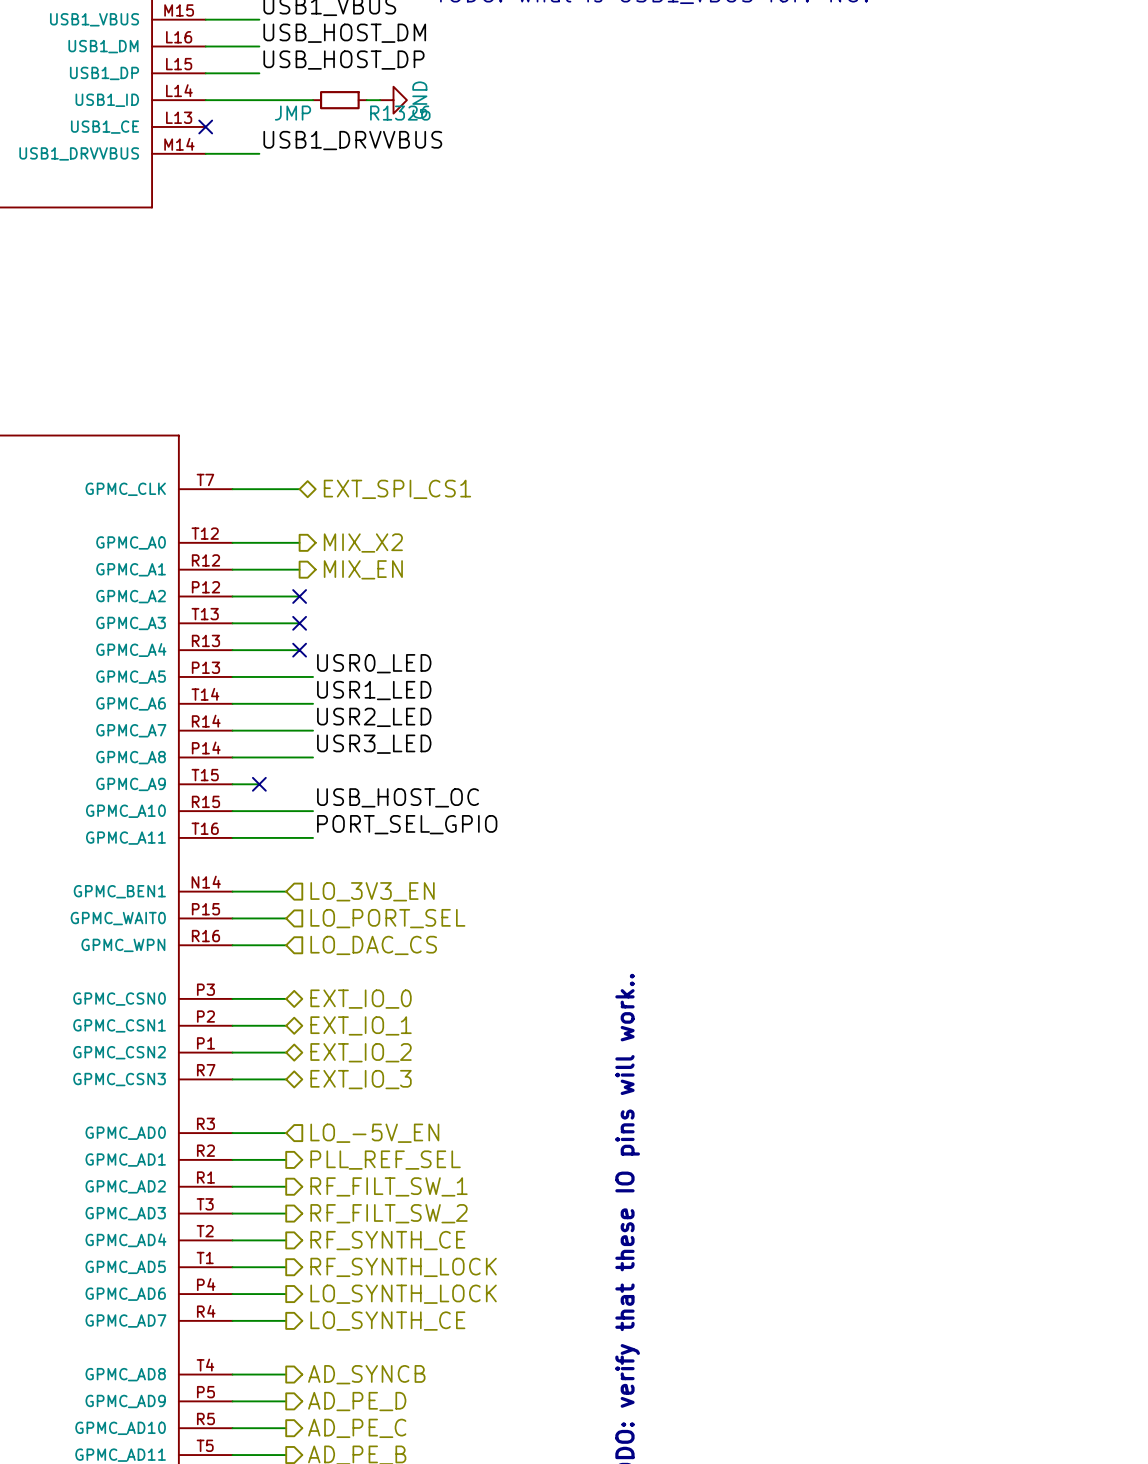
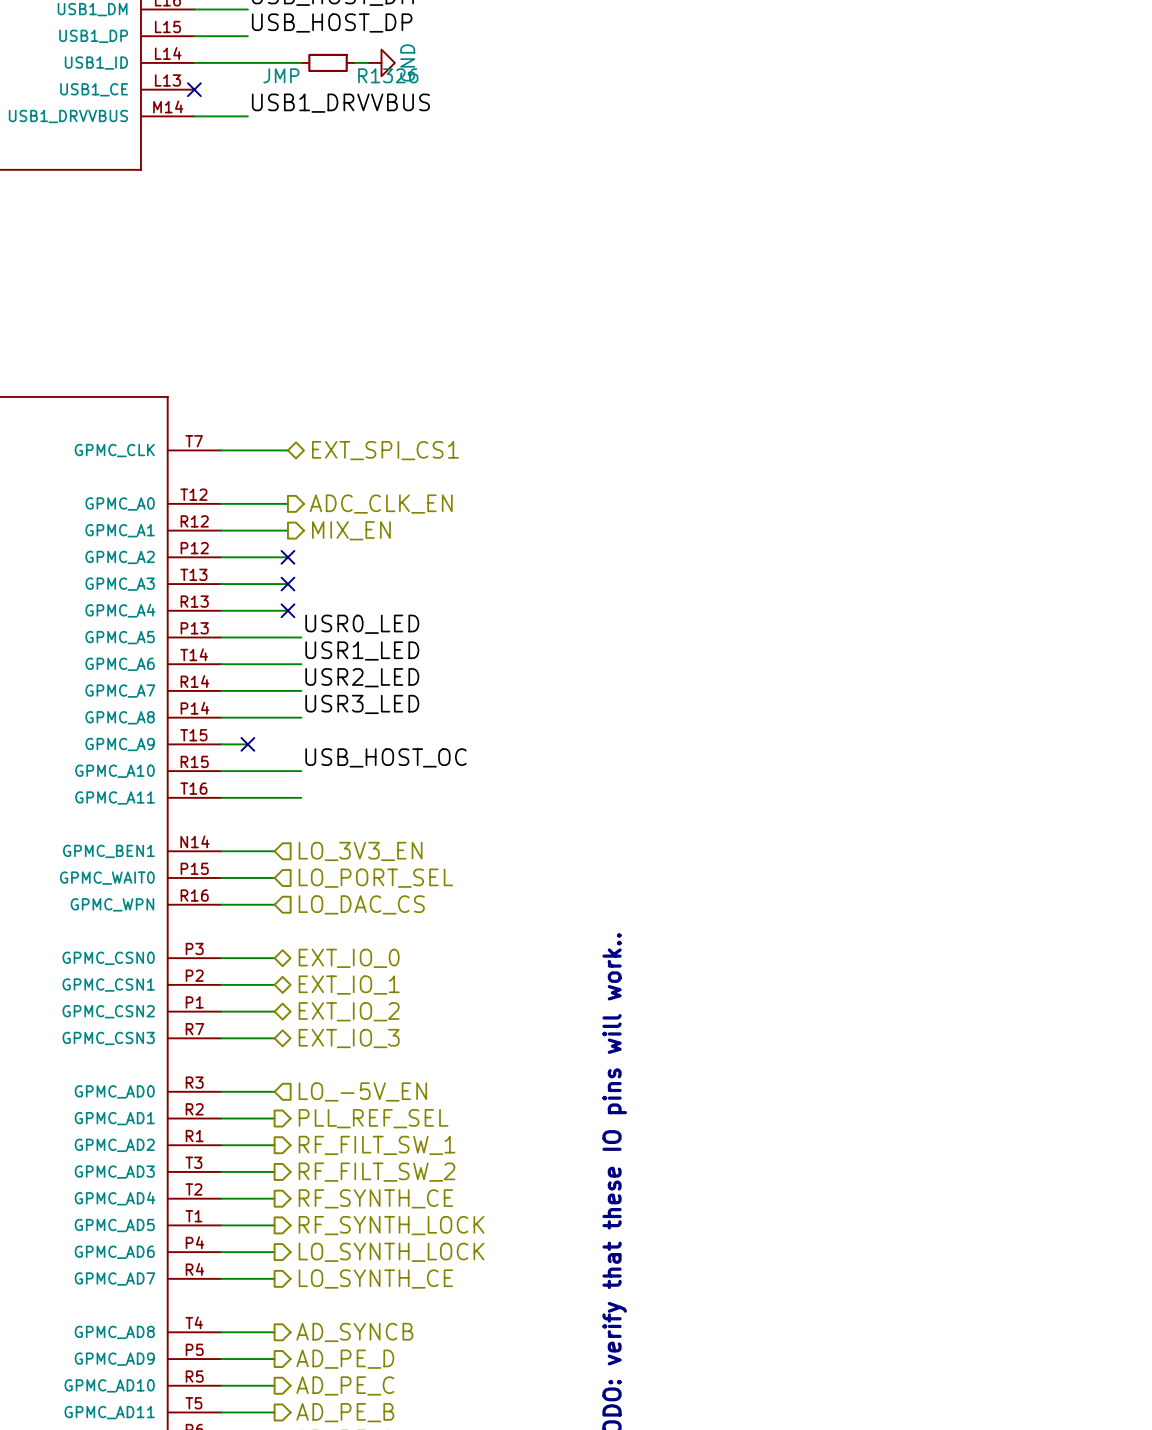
hierarchical label: MIX_X2 (363, 543) -> ADC_CLK_EN (381, 504)
label: PORT_SEL_GPIO (407, 824) -> none

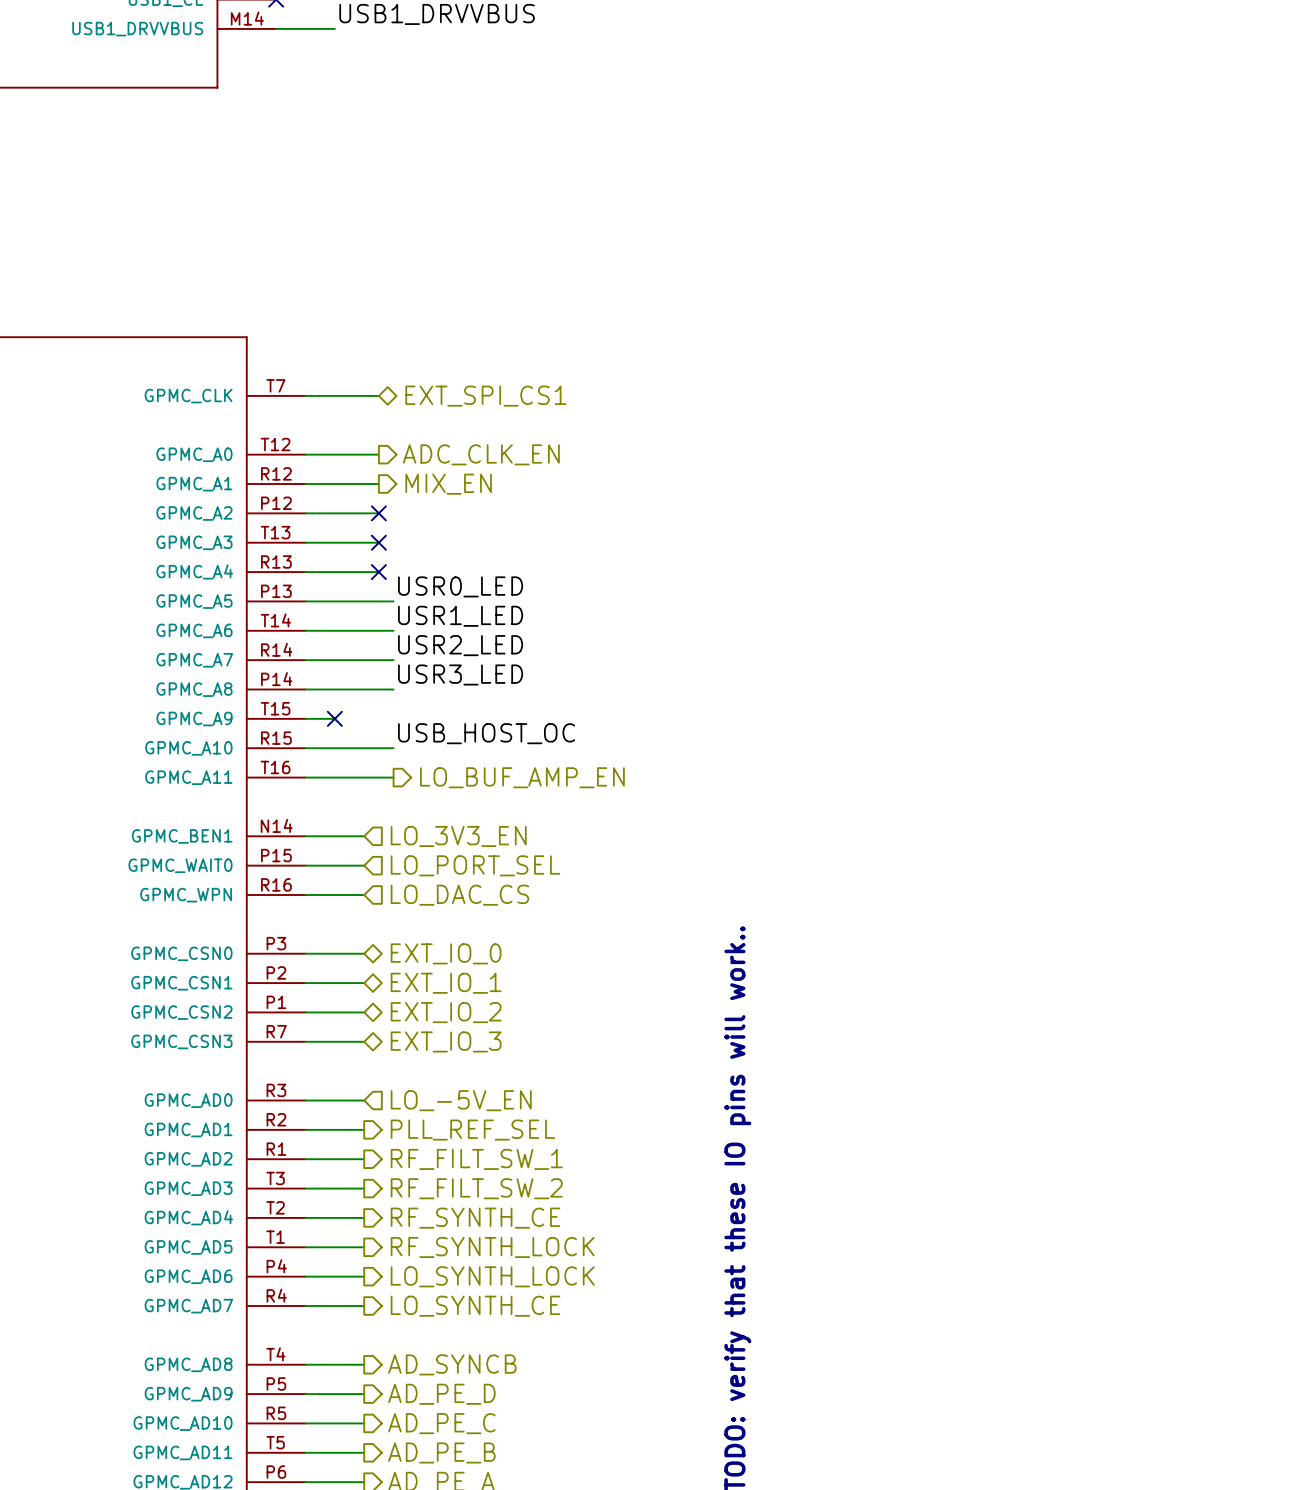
hierarchical label: none -> LO_BUF_AMP_EN (522, 777)

